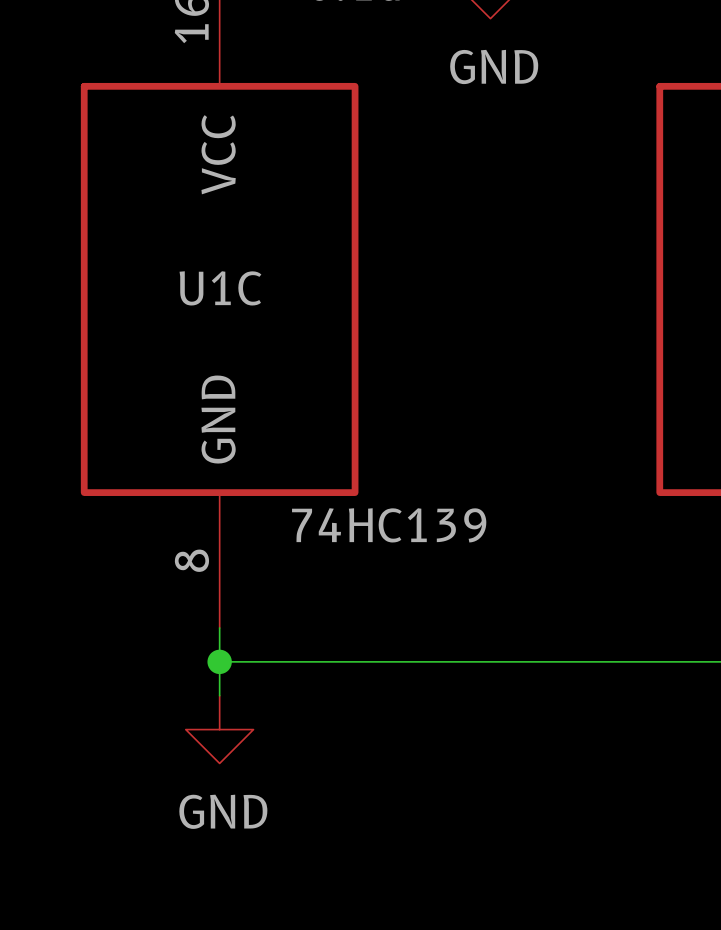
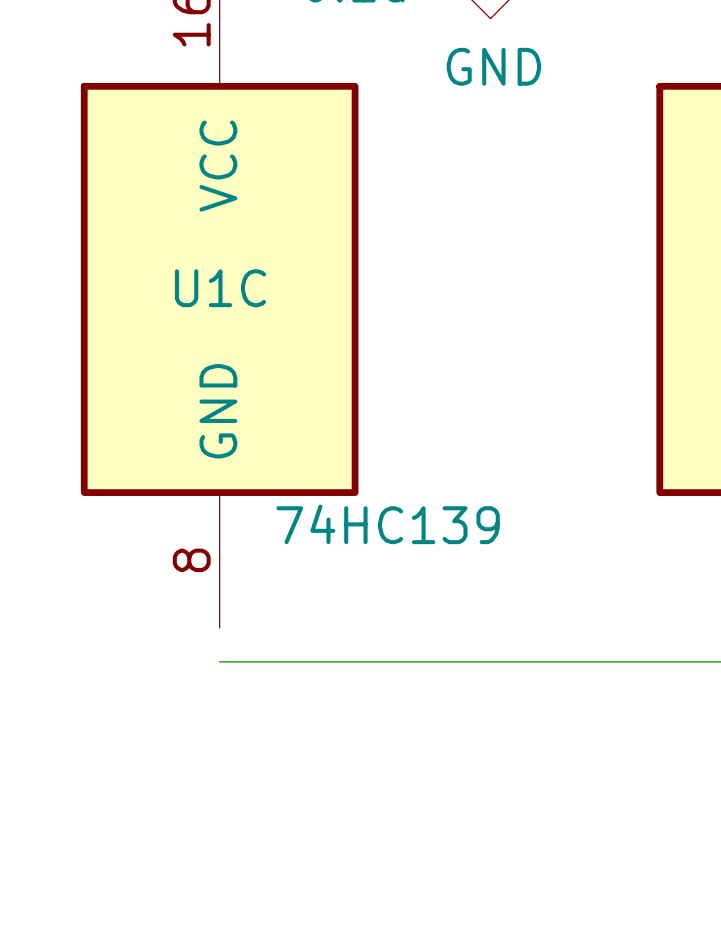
wire: (219, 628) (219, 695) -> none
junction: (219, 661) -> none
power symbol: GND (219, 729) -> none

